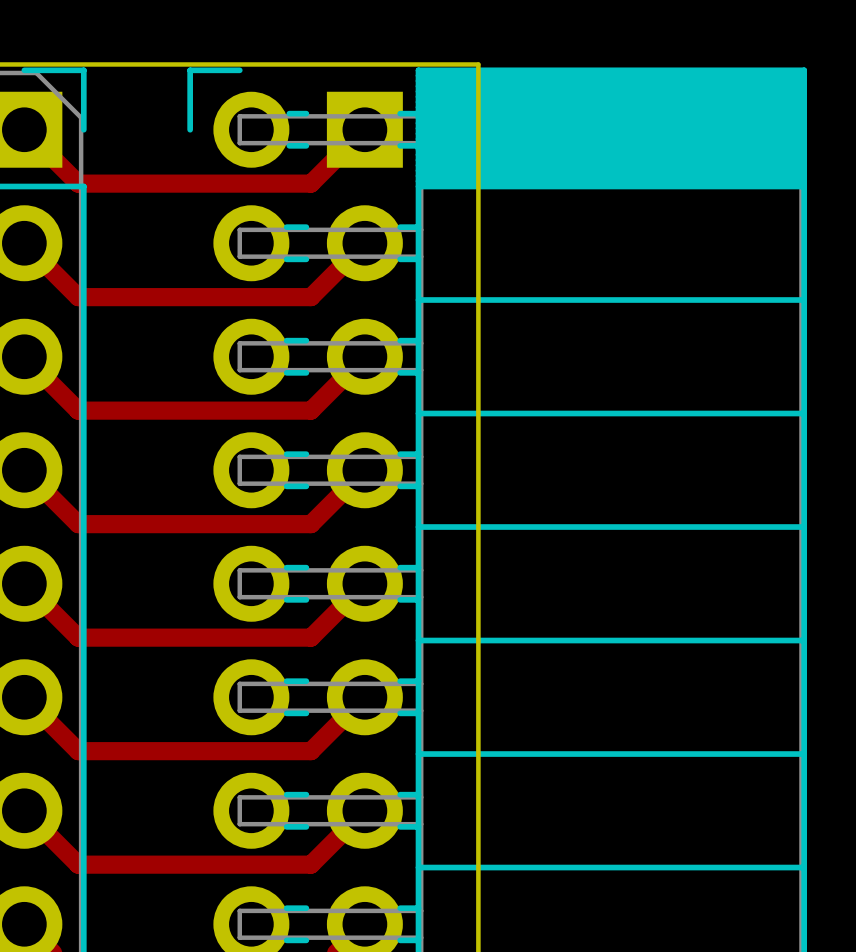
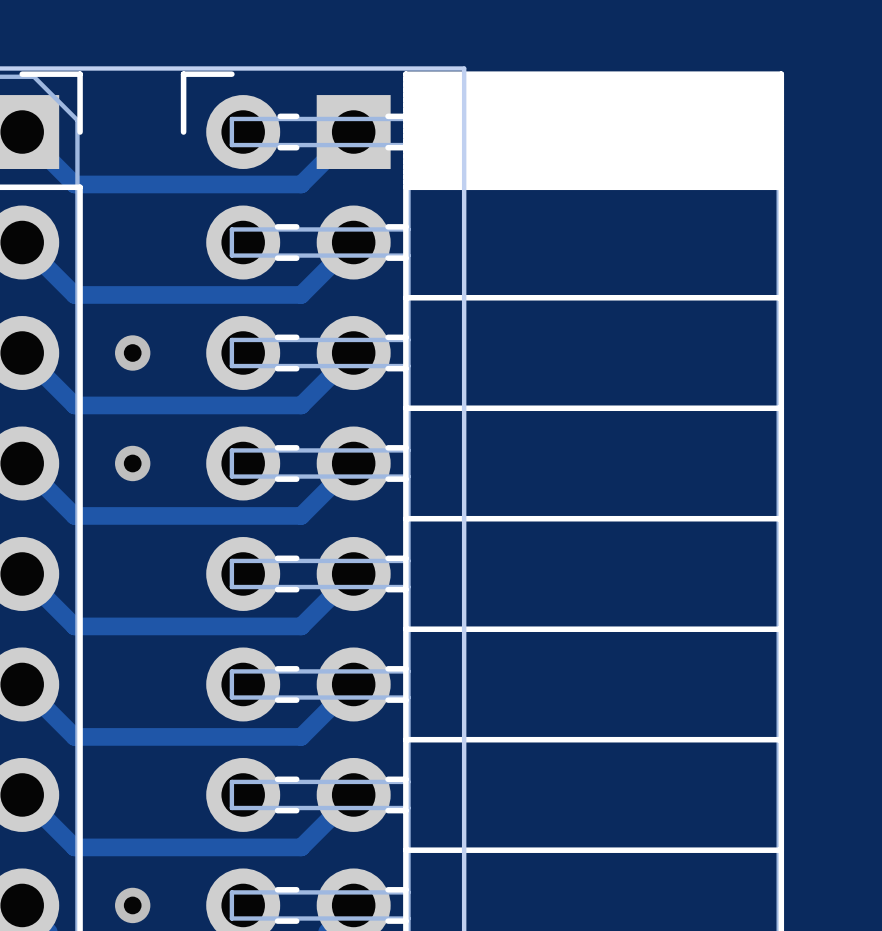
via: none -> (132, 353)
via: none -> (132, 463)
via: none -> (132, 905)

